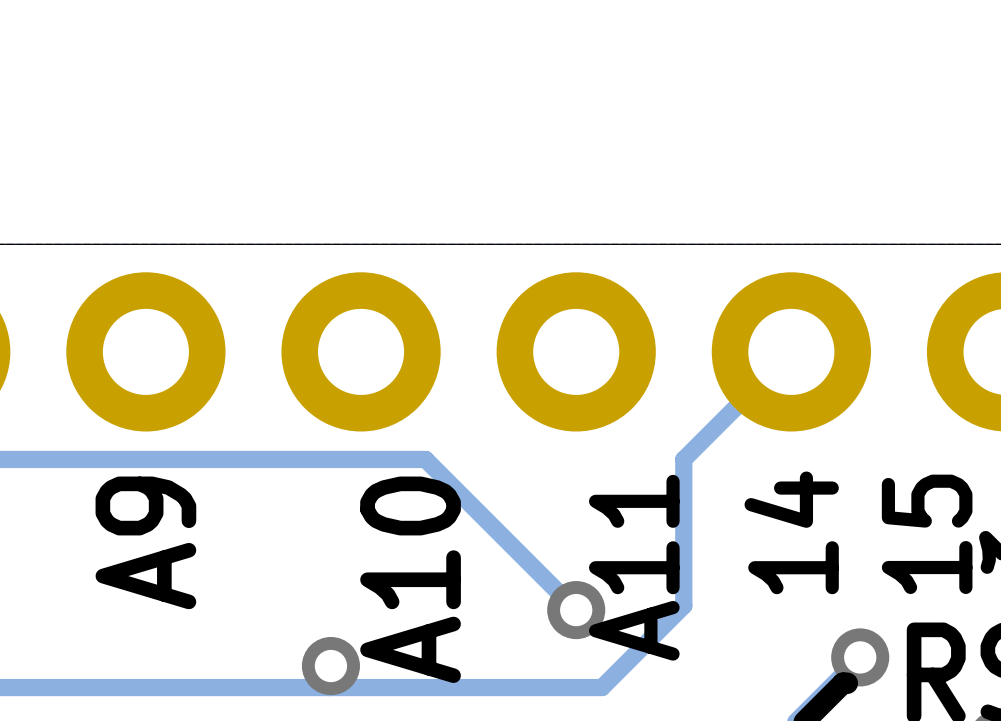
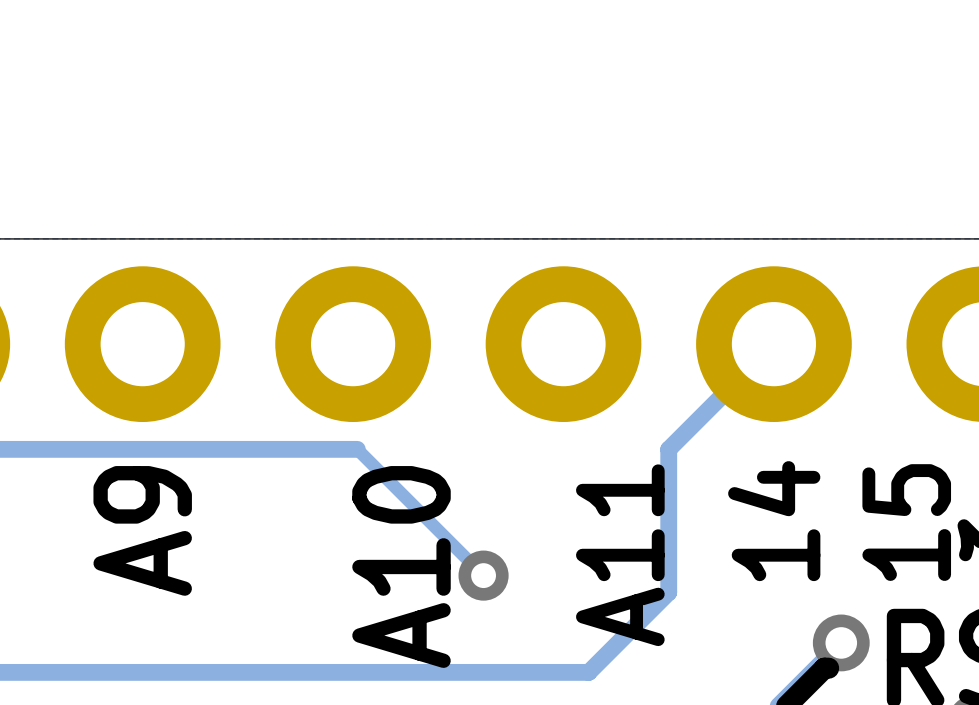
track: (365, 459) (425, 459) (576, 610) -> (357, 449) (483, 575)
via: none -> (483, 575)
via: (576, 610) -> none
via: (330, 666) -> none

